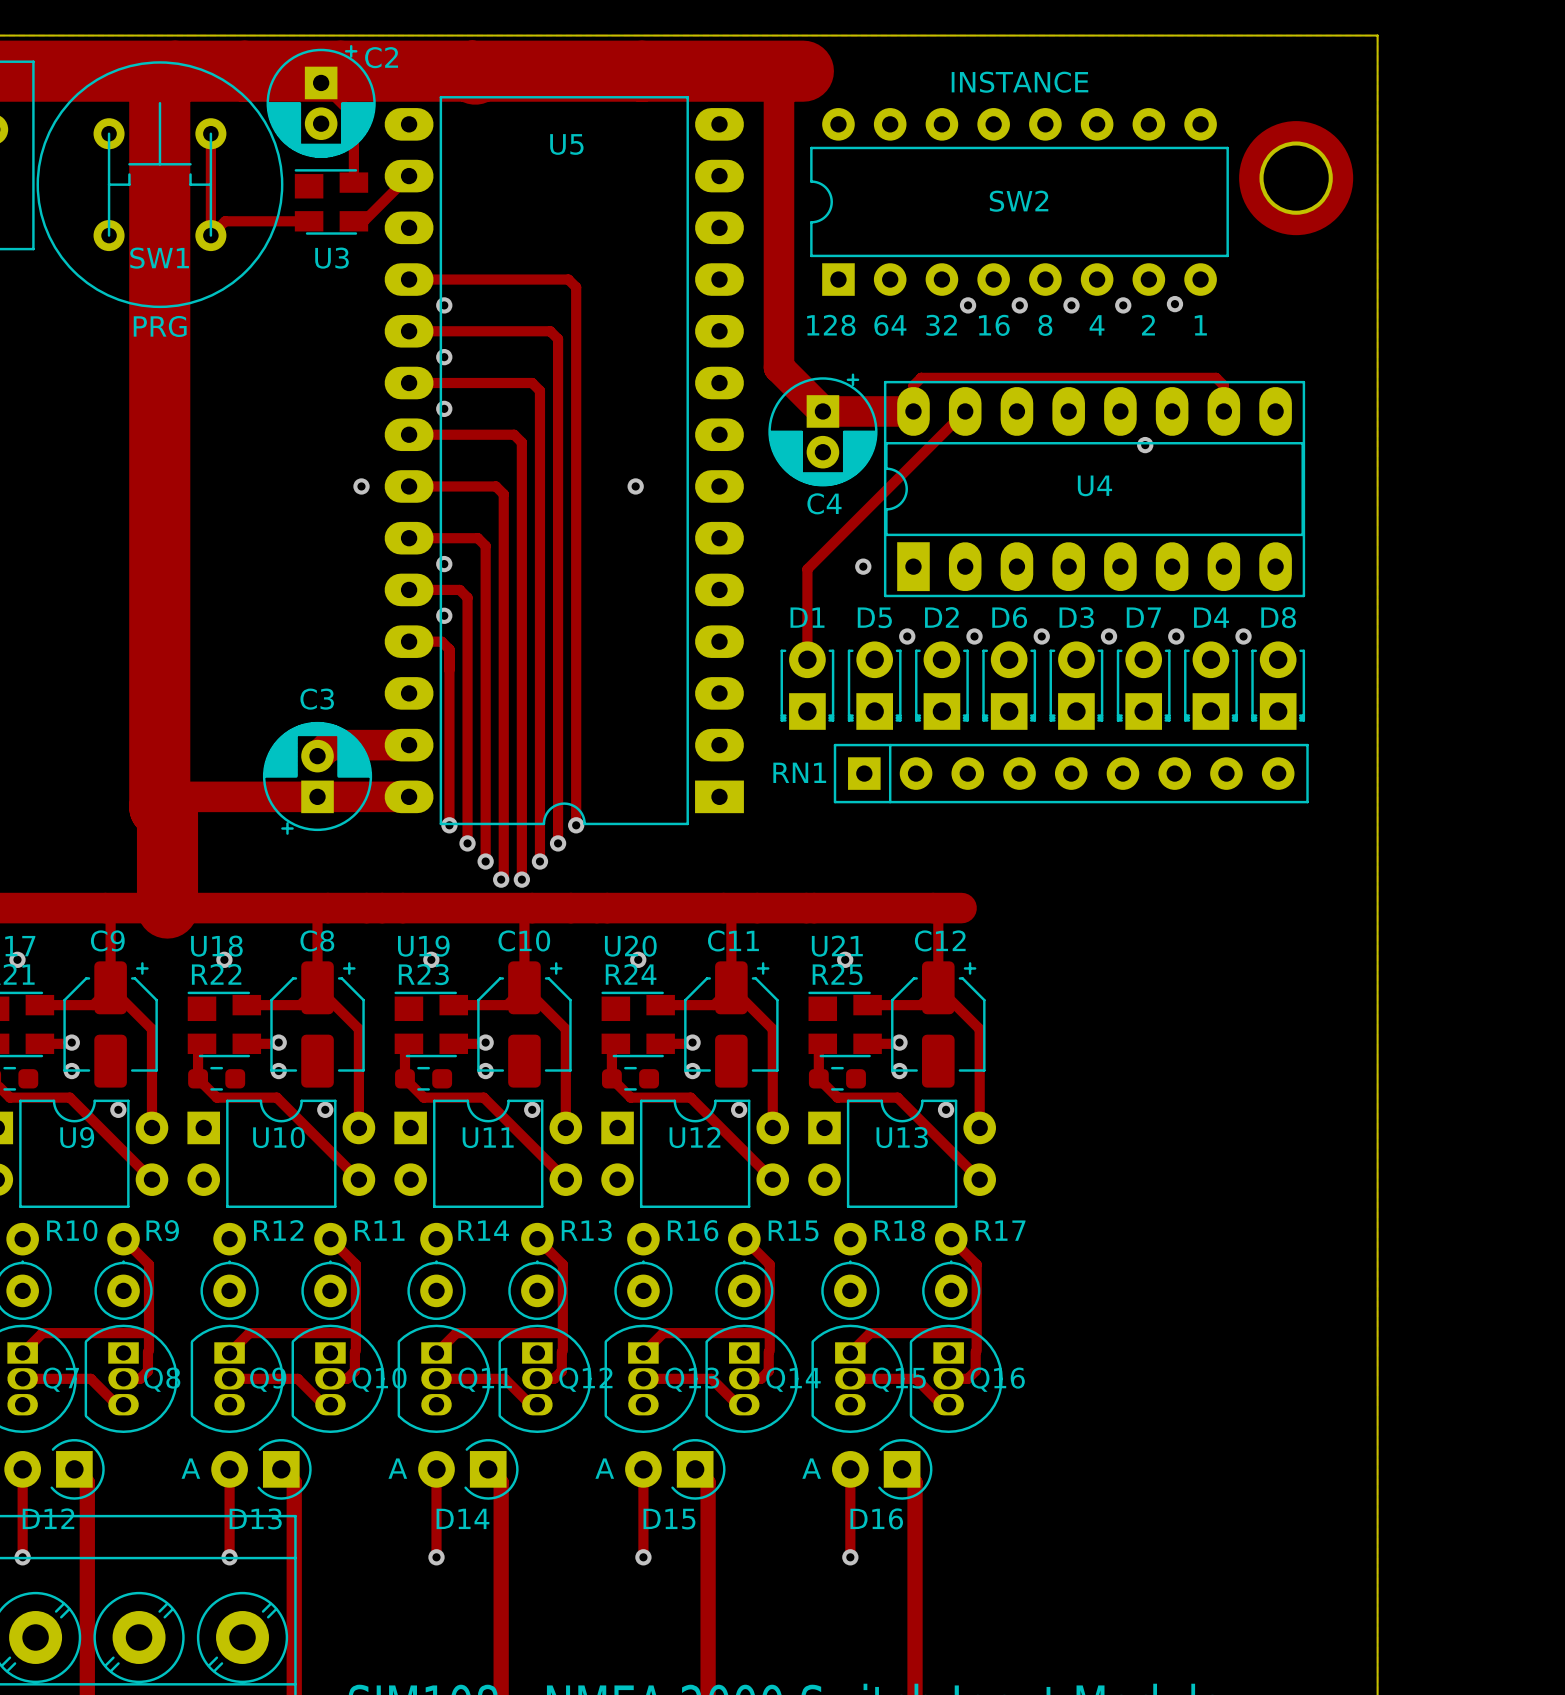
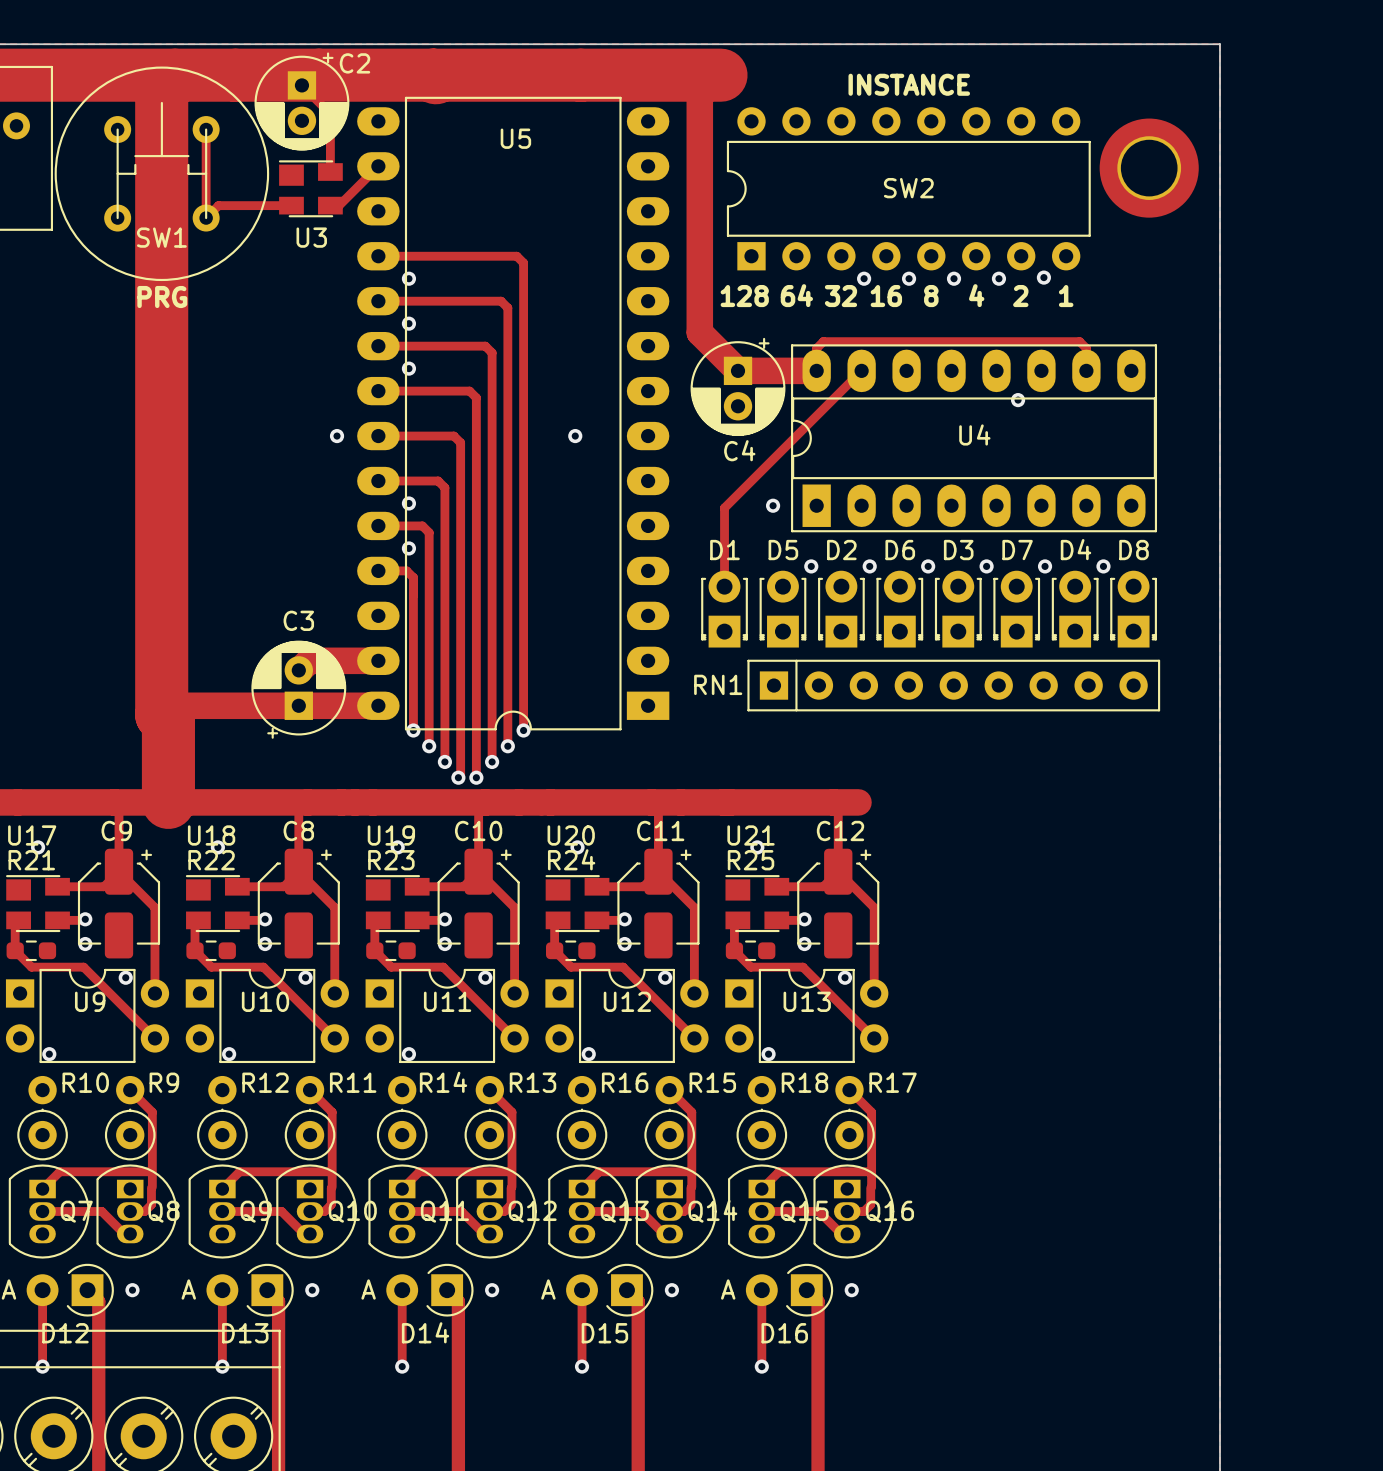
via: none -> (49, 1054)
via: none -> (229, 1054)
via: none -> (408, 1054)
via: none -> (588, 1054)
via: none -> (768, 1054)
via: none -> (132, 1290)
via: none -> (312, 1290)
via: none -> (492, 1290)
via: none -> (671, 1290)
via: none -> (851, 1290)

